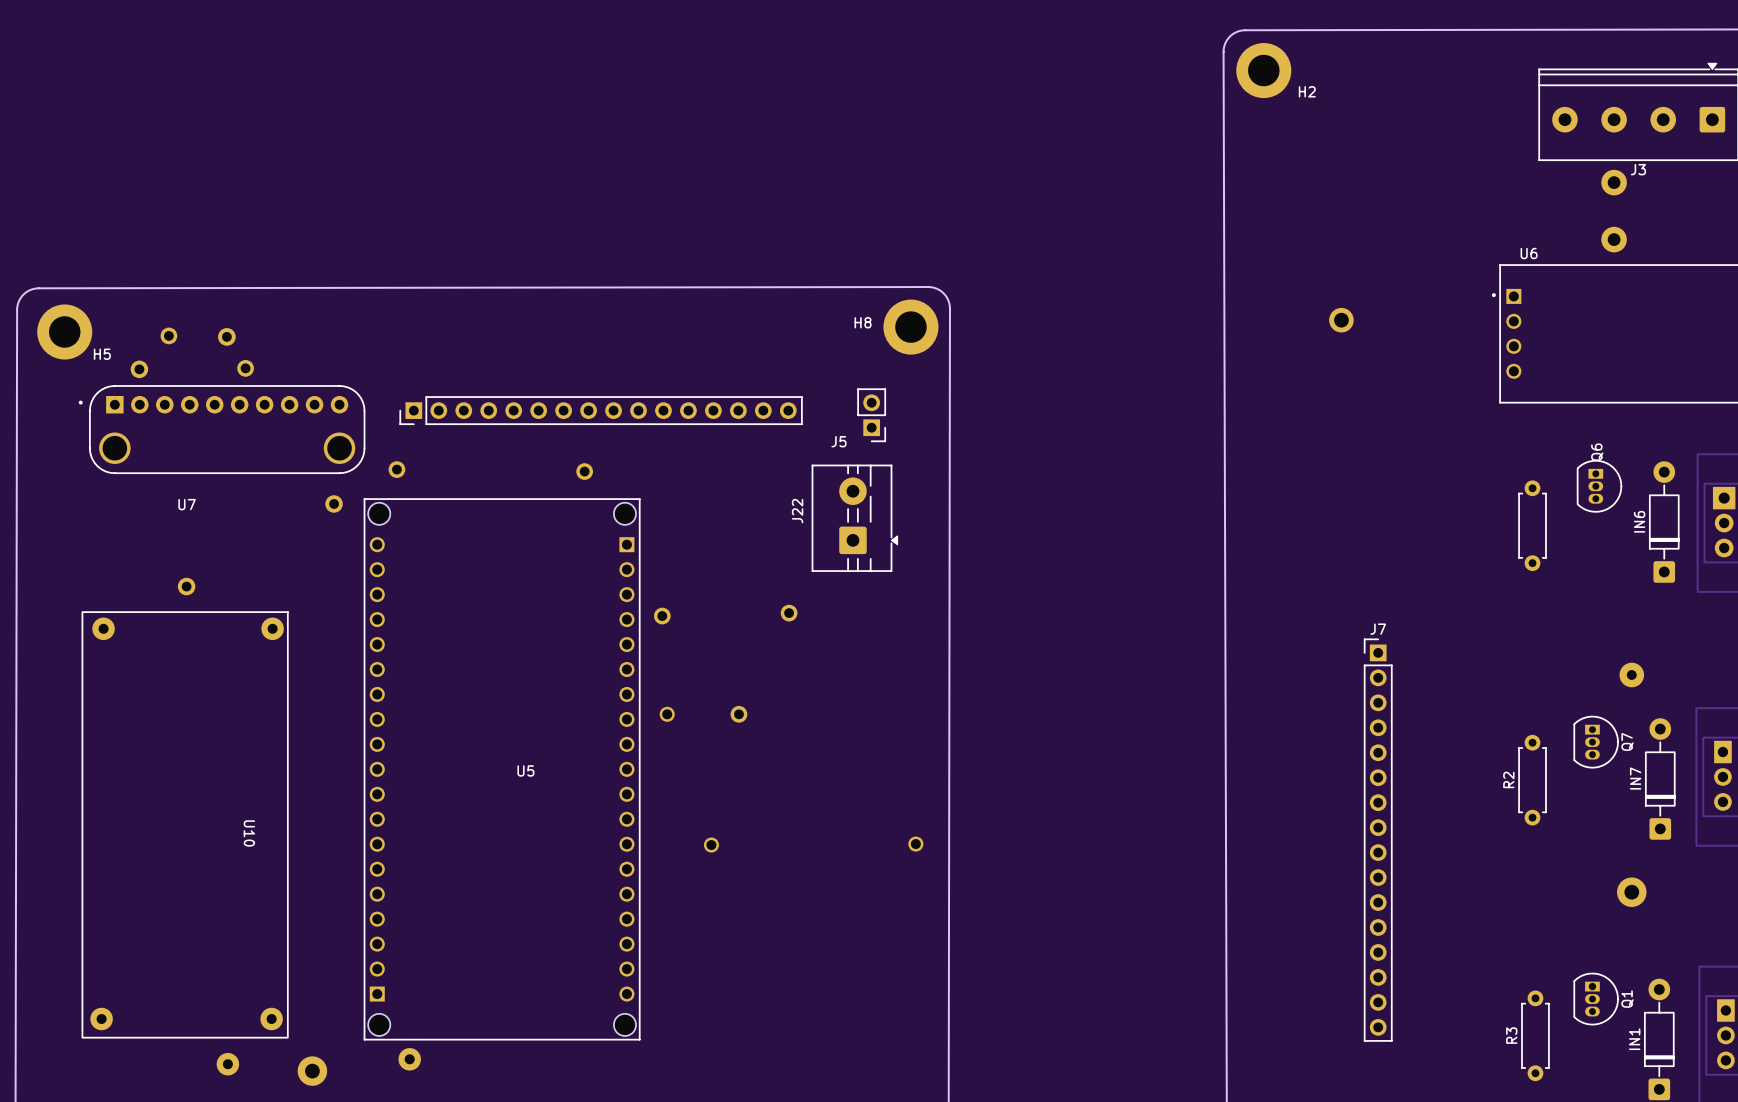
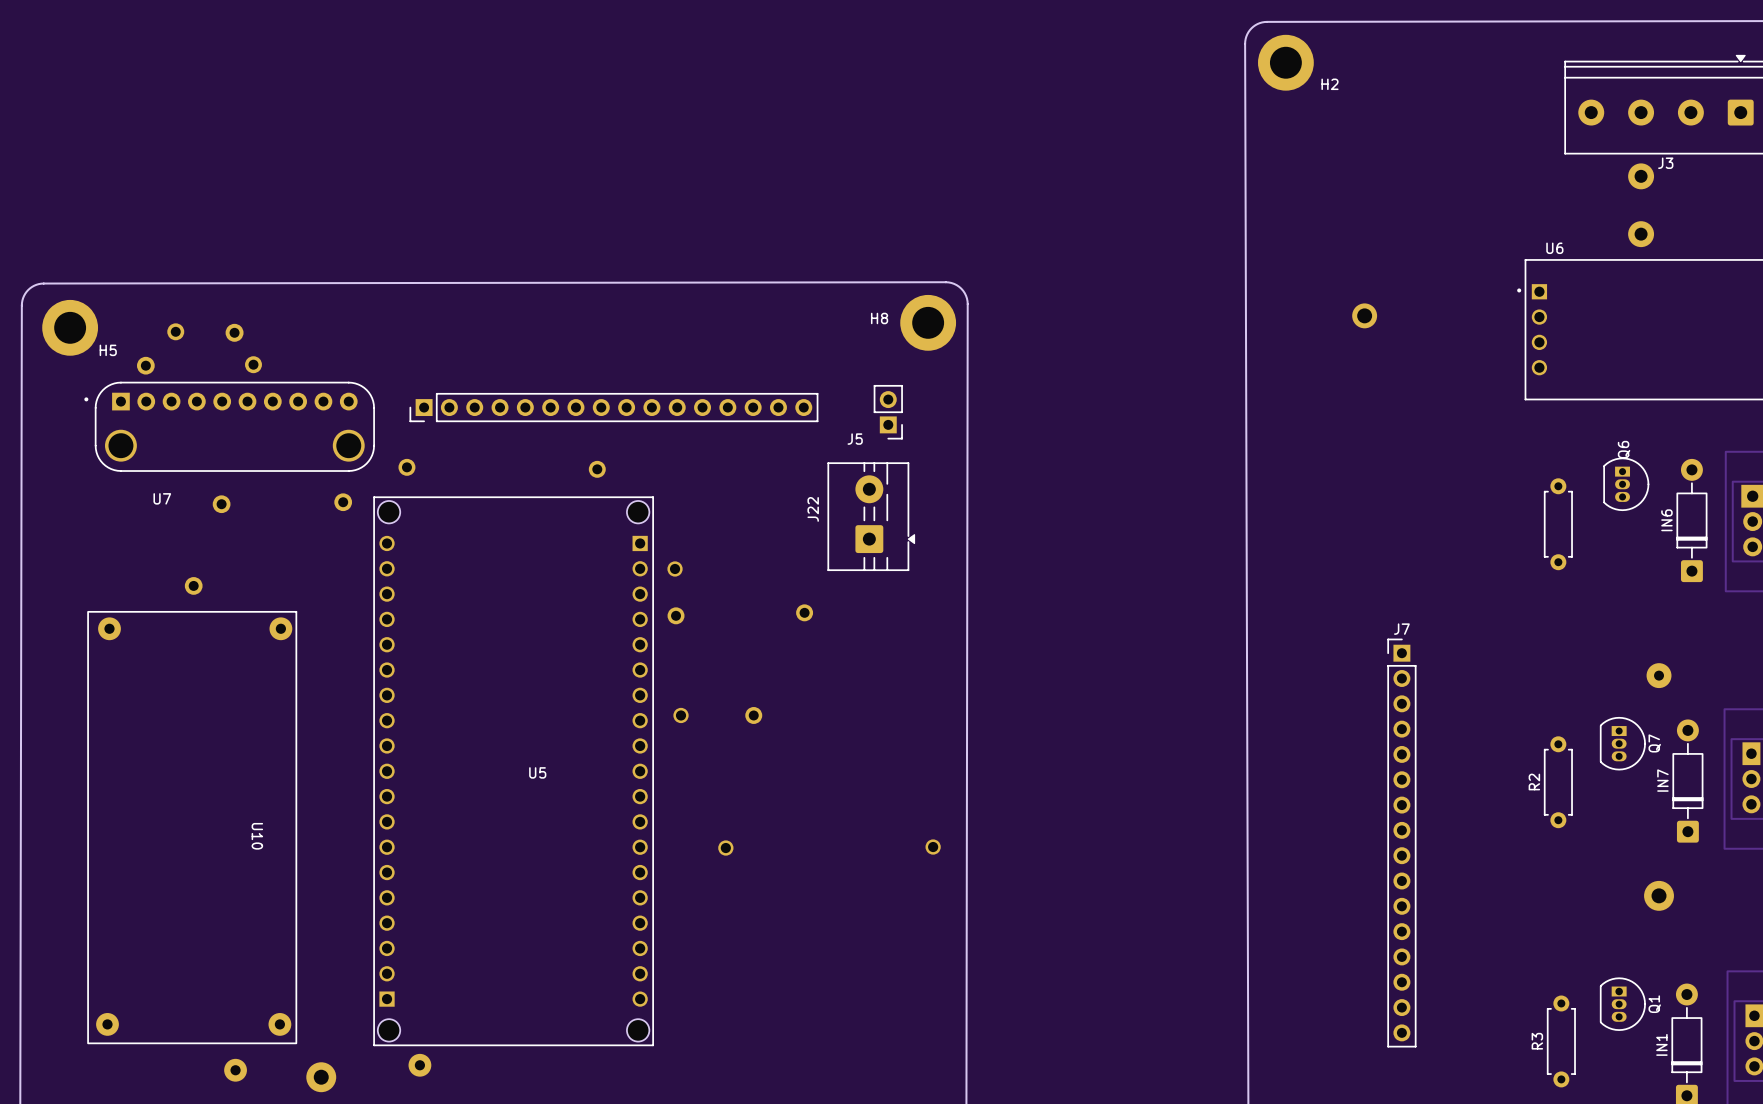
U7 name position: U7 (187, 504) -> U7 (162, 498)
part: none -> (221, 504)
part: none -> (675, 568)

